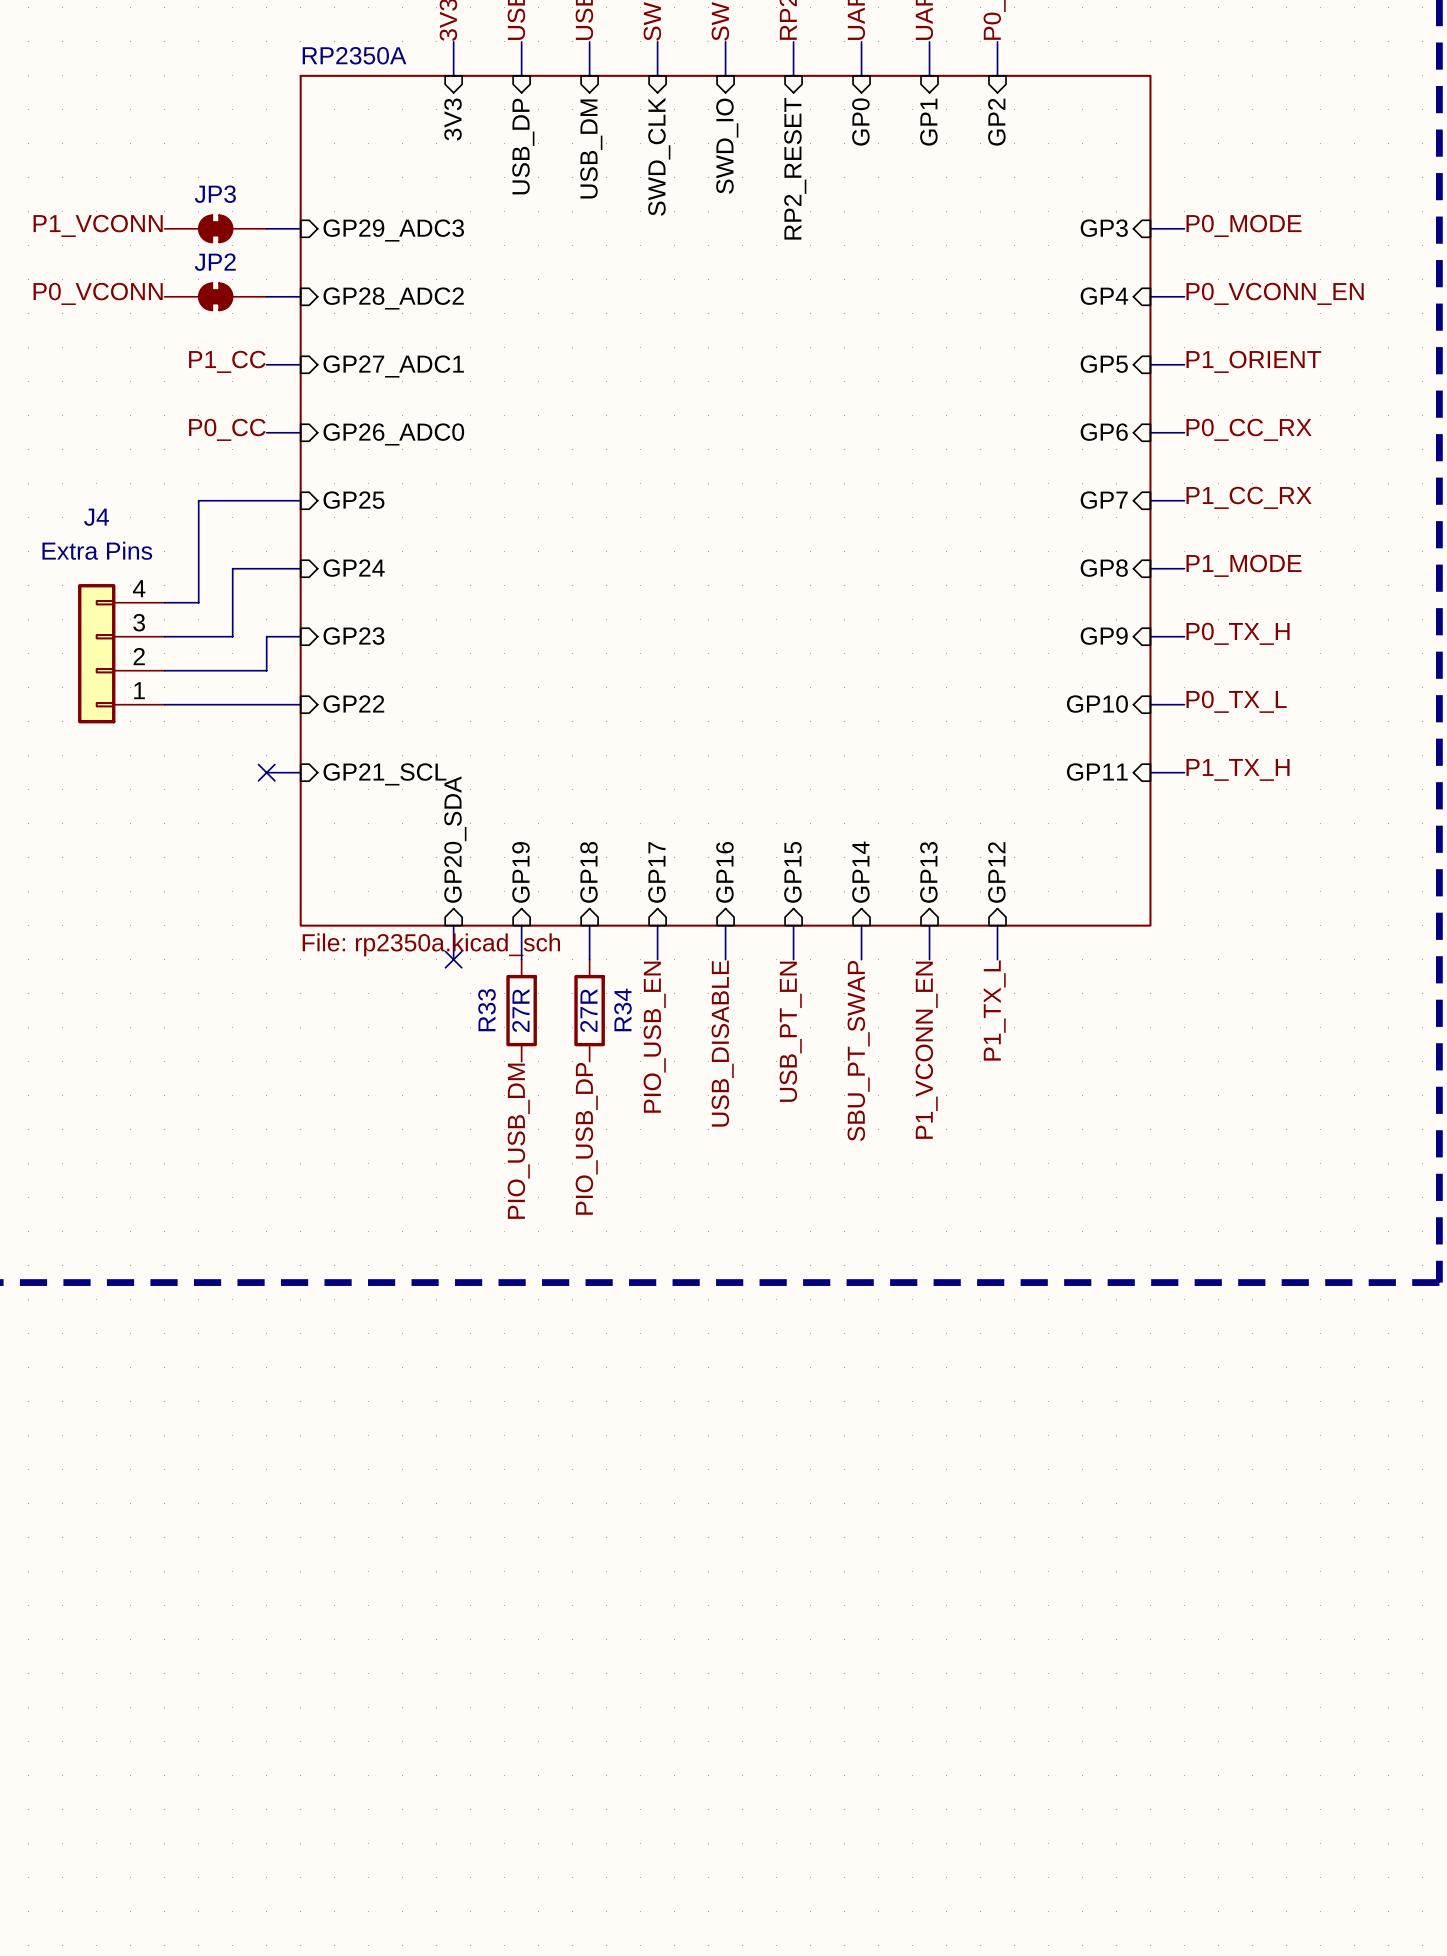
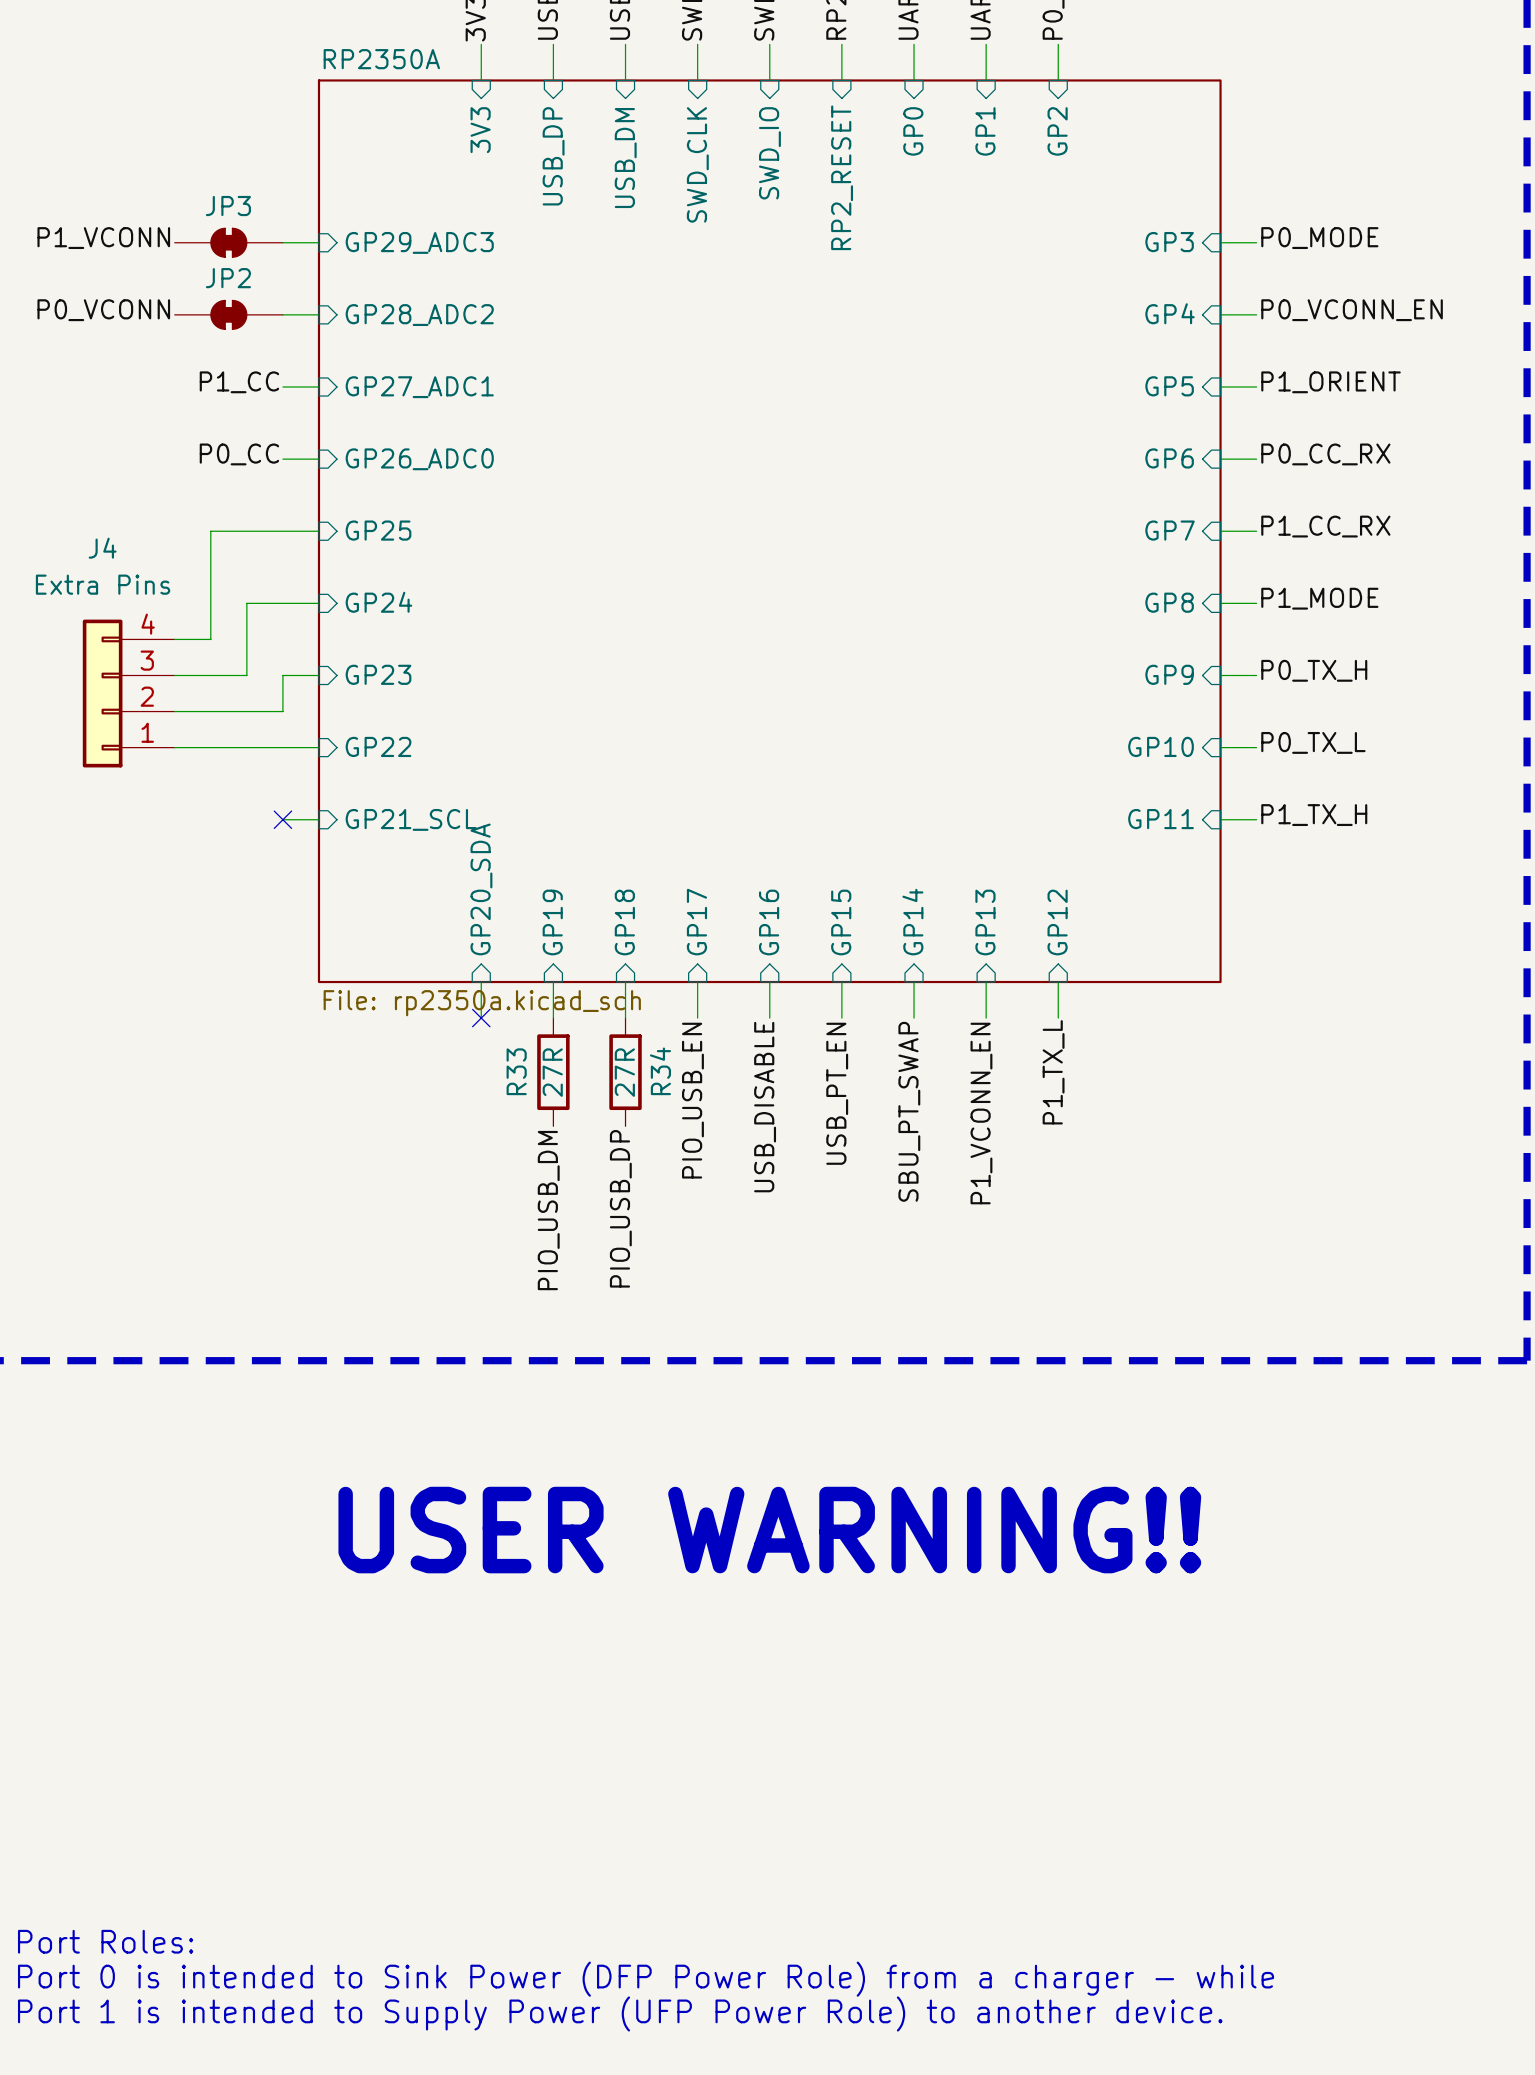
text: none -> USER WARNING!! (769, 1530)
text: none -> Port Roles: (105, 1941)
text: none -> Port 0 is intended to Sink Power (DFP Power Role) from a charger - while (646, 1979)
text: none -> Port 1 is intended to Supply Power (UFP Power Role) to another device. (620, 2013)

